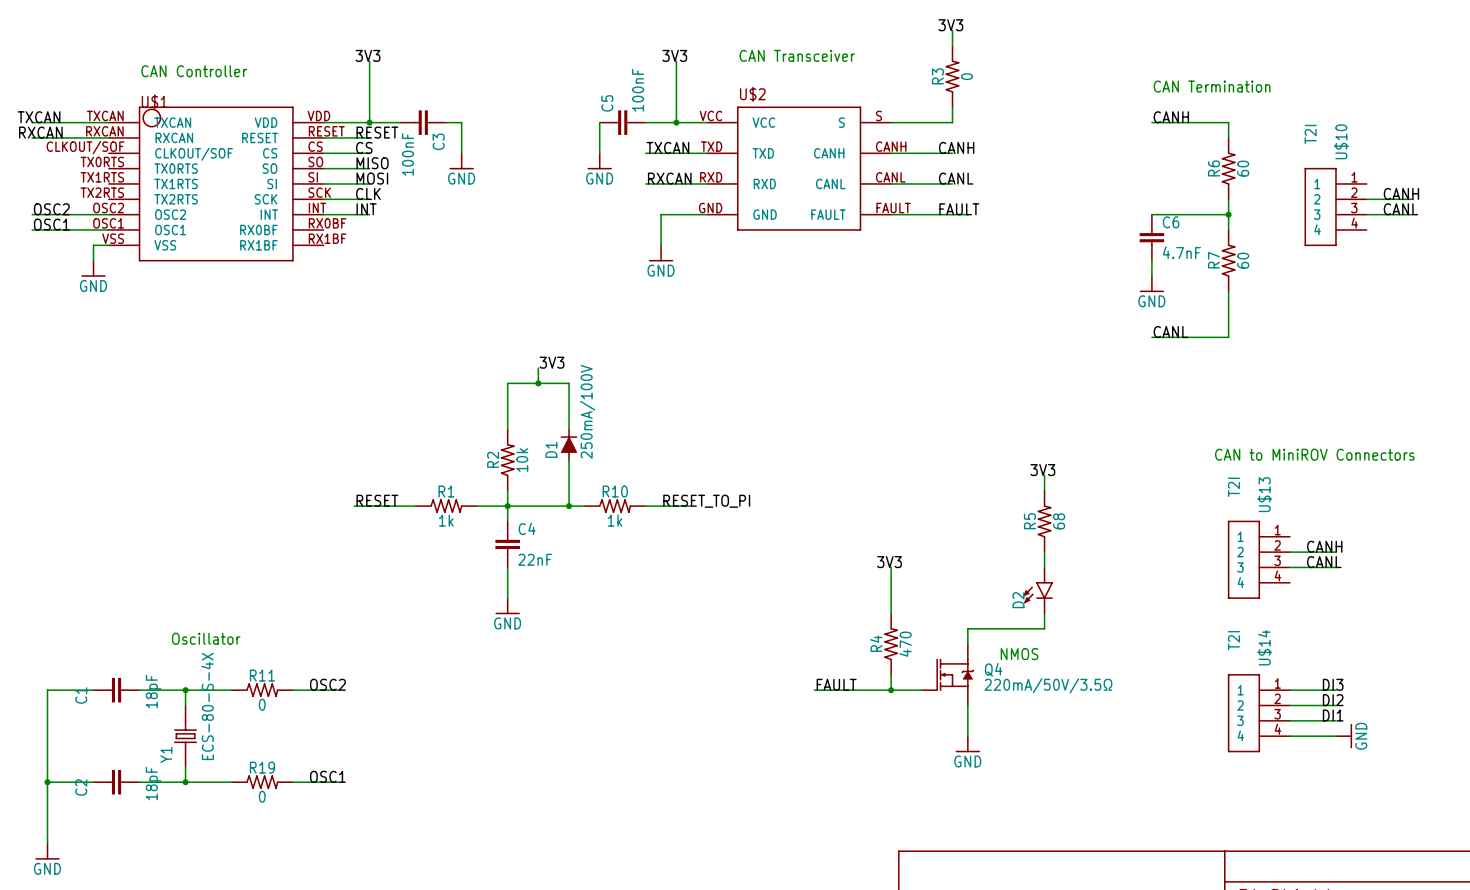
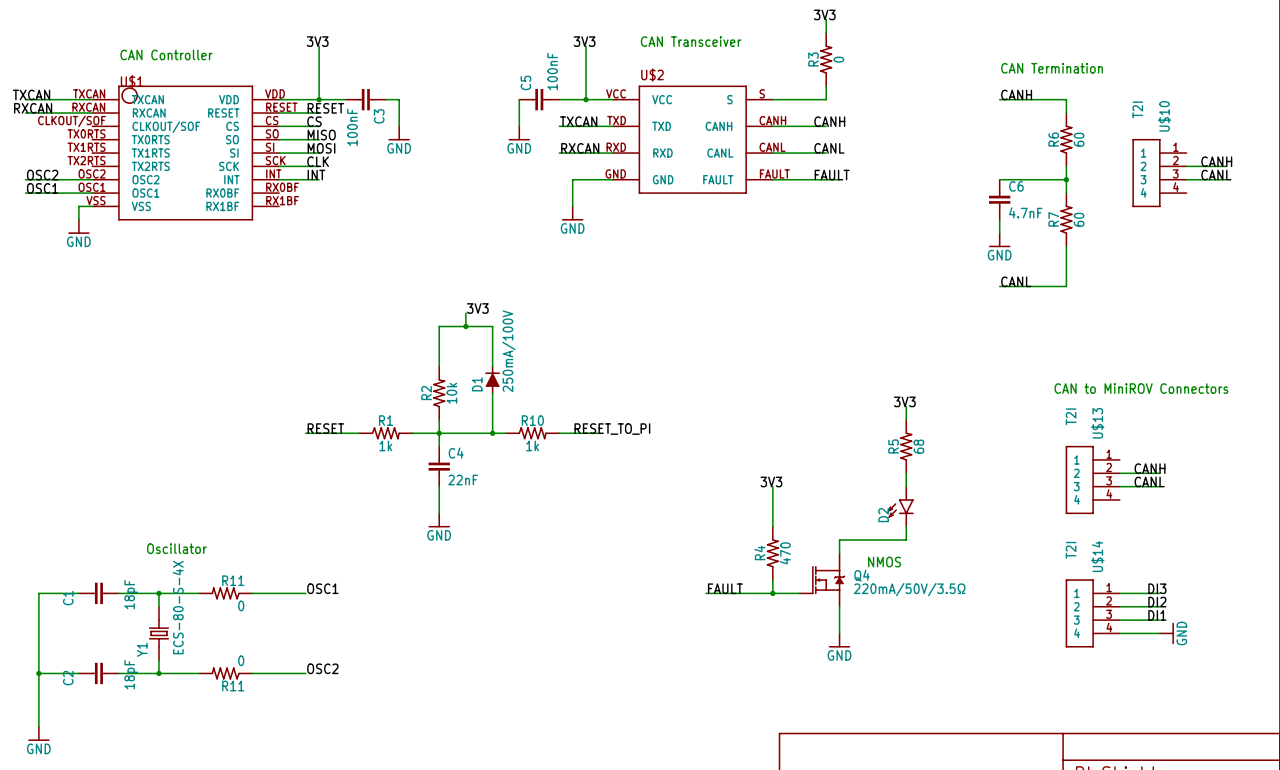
R11 name position: R11 (262, 675) -> R11 (233, 686)
R11 symbol: [231, 683, 293, 697] -> [199, 667, 253, 680]
label position: OSC2 (327, 684) -> OSC2 (322, 668)
0: none -> R11 (225, 593)
wire: none -> (292, 593) (305, 593)
R11 value position: 0 (262, 704) -> 0 (241, 660)
label position: OSC1 (327, 776) -> OSC1 (322, 588)
R19: 0 (262, 782) -> none
wire: none -> (292, 673) (305, 673)

